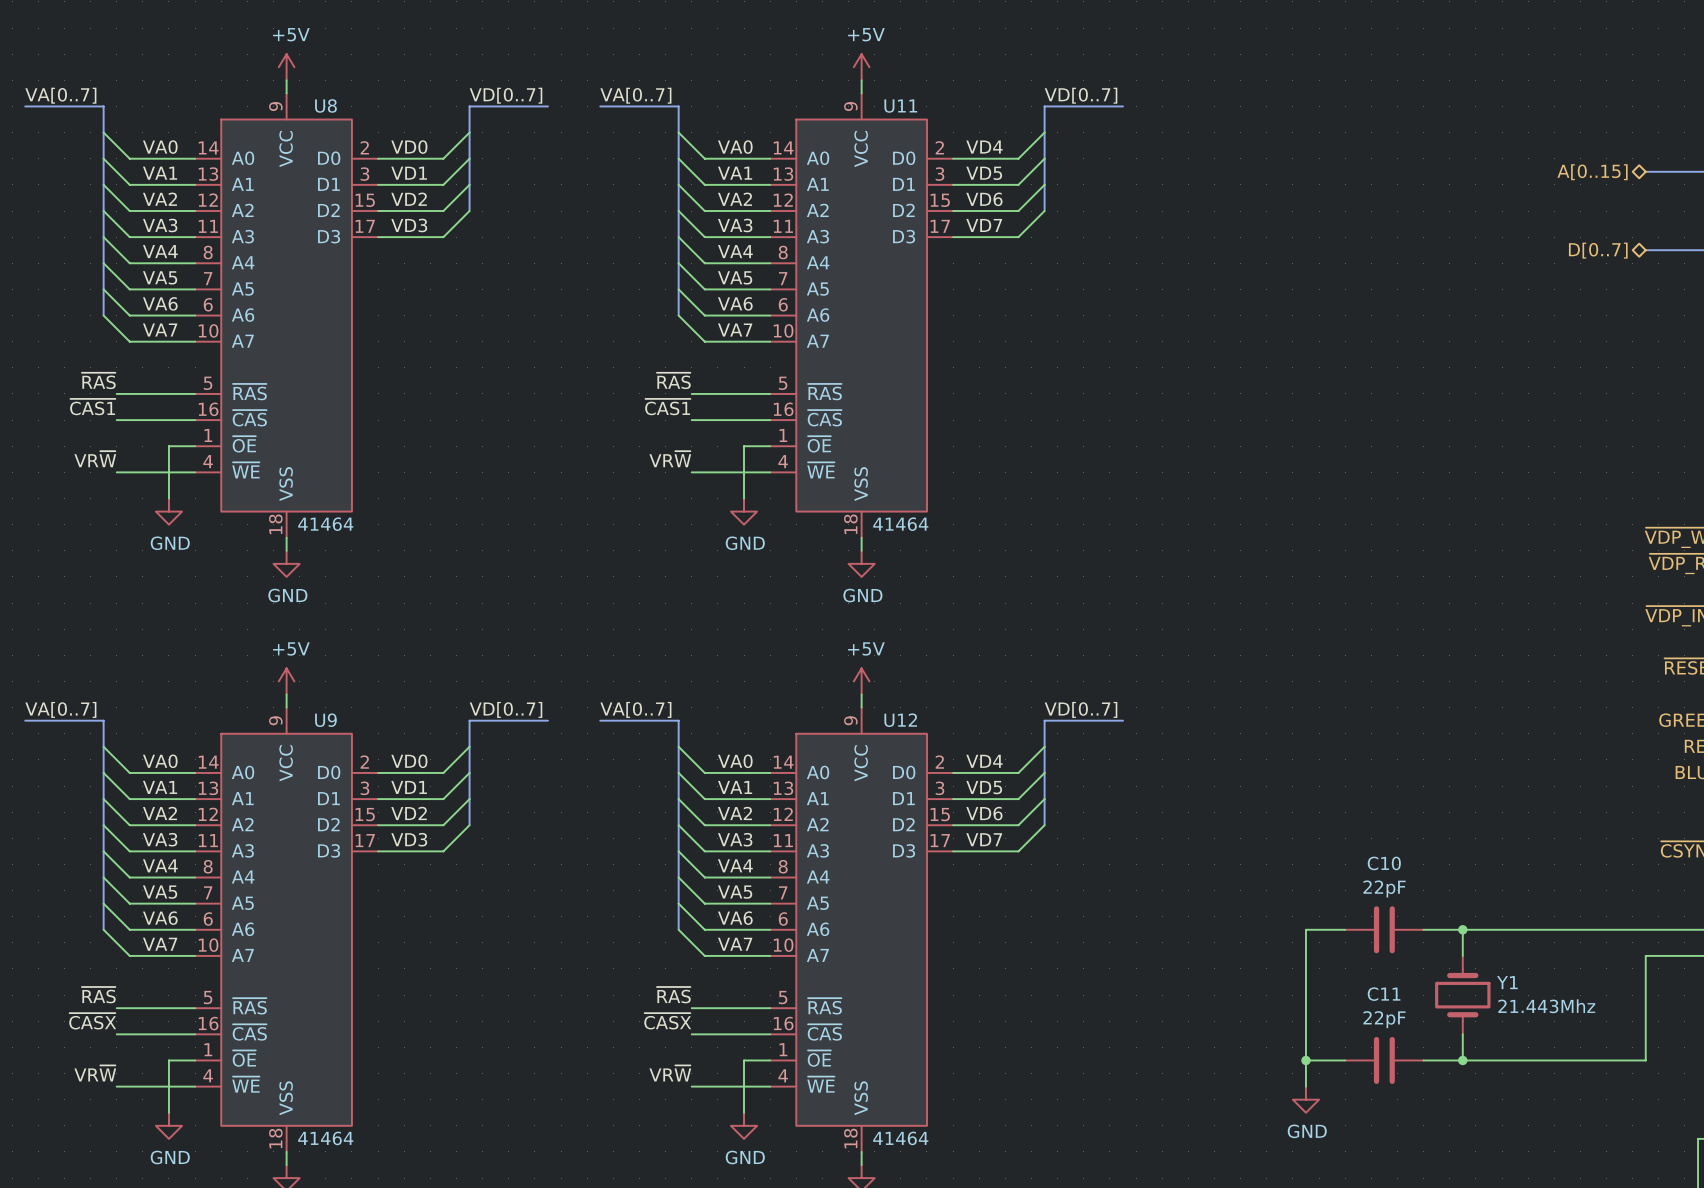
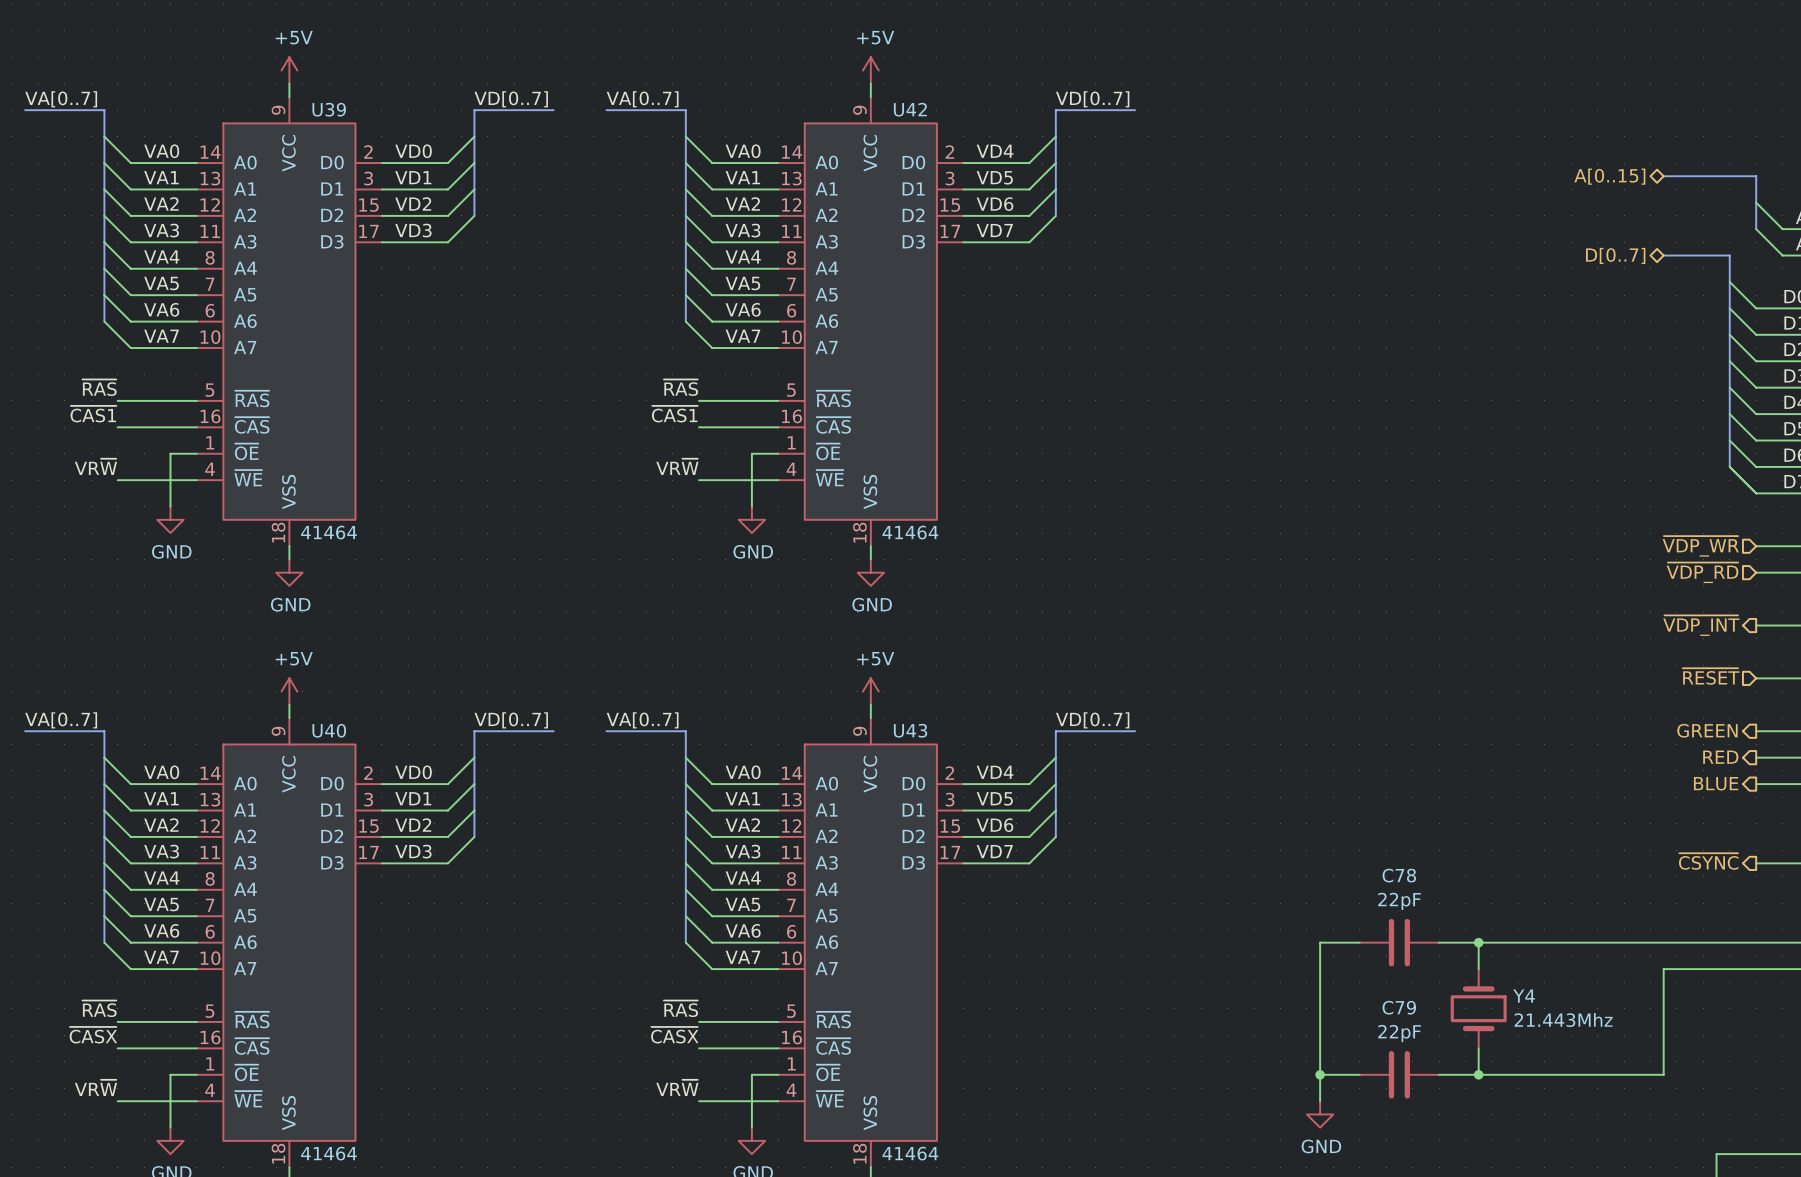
U8 name: U8 (325, 105) -> U39 (329, 109)
U11 name: U11 (900, 106) -> U42 (910, 109)
U9 name: U9 (325, 720) -> U40 (329, 730)
U12 name: U12 (900, 720) -> U43 (910, 730)
C10 name: C10 (1384, 863) -> C78 (1399, 875)
Y1 name: Y1 (1507, 982) -> Y4 (1524, 996)
C11 name: C11 (1384, 994) -> C79 (1399, 1007)

